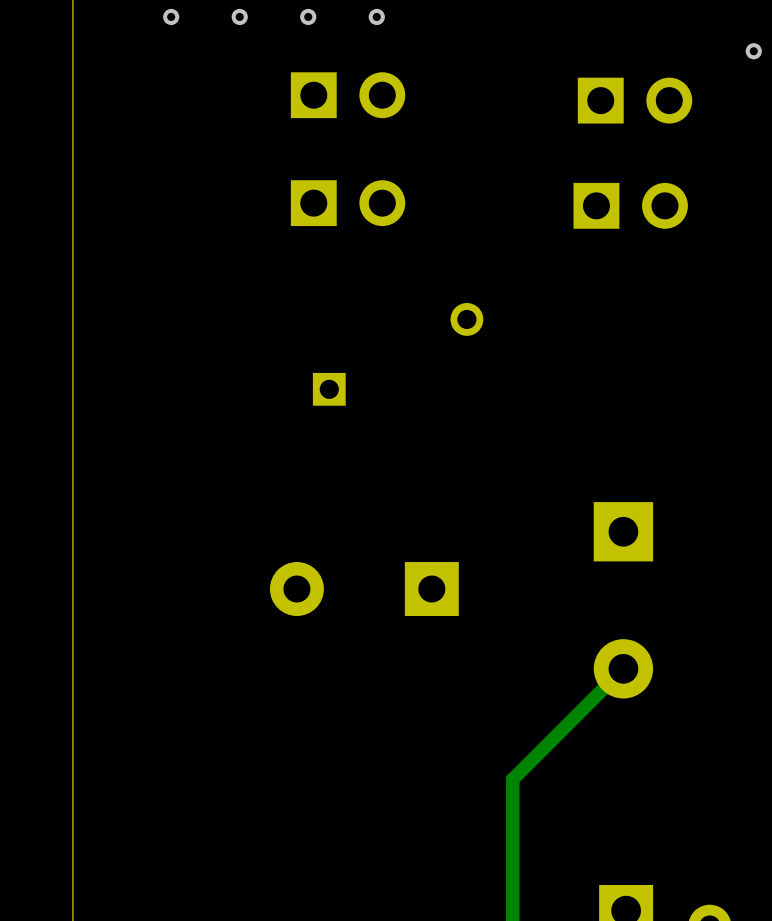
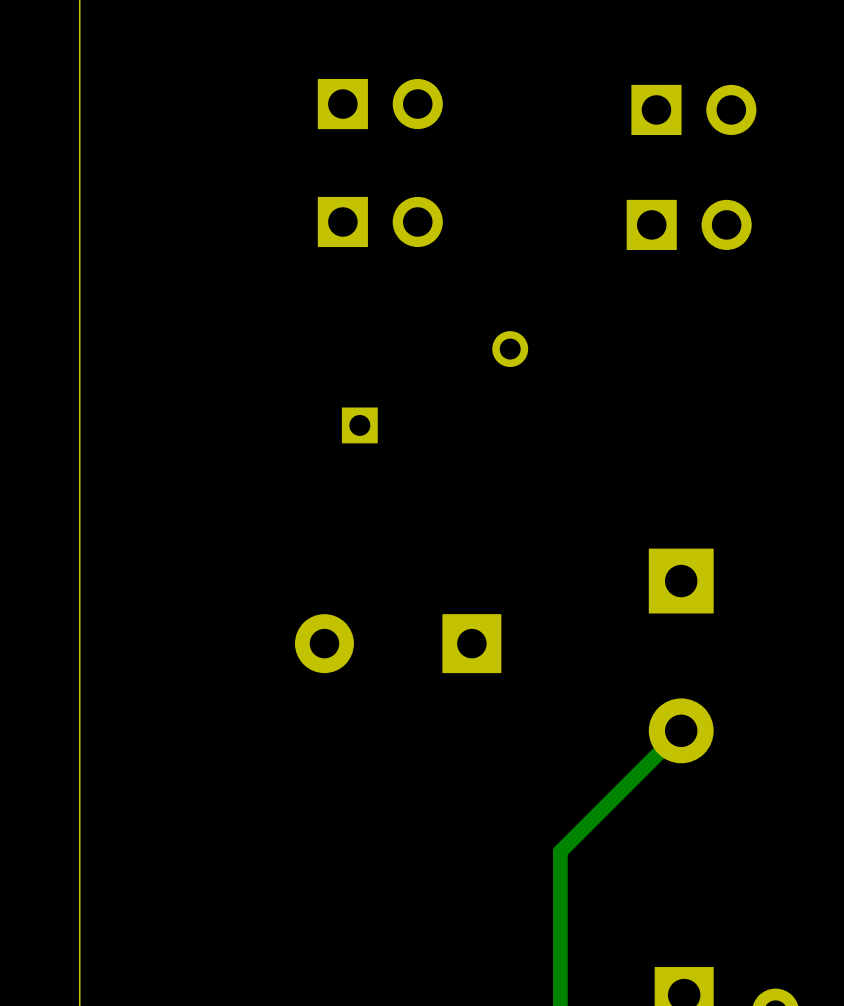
via: (171, 16) -> none
via: (239, 16) -> none
via: (308, 16) -> none
via: (376, 16) -> none
via: (753, 51) -> none

